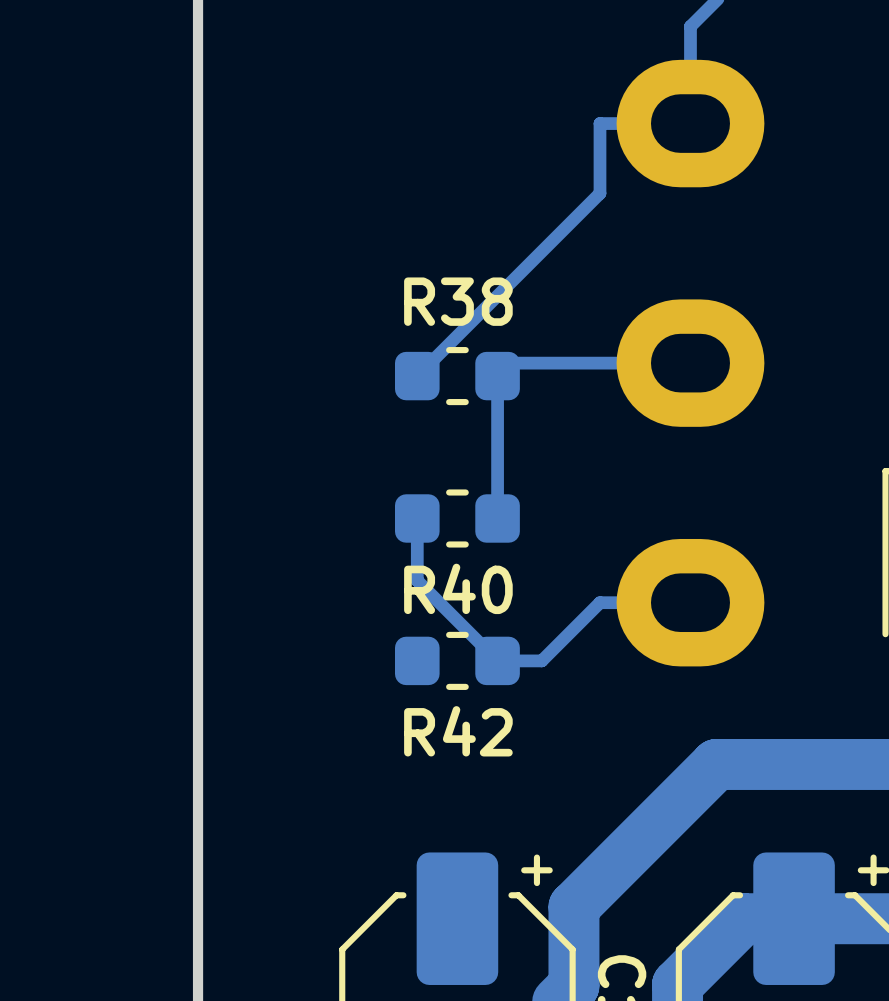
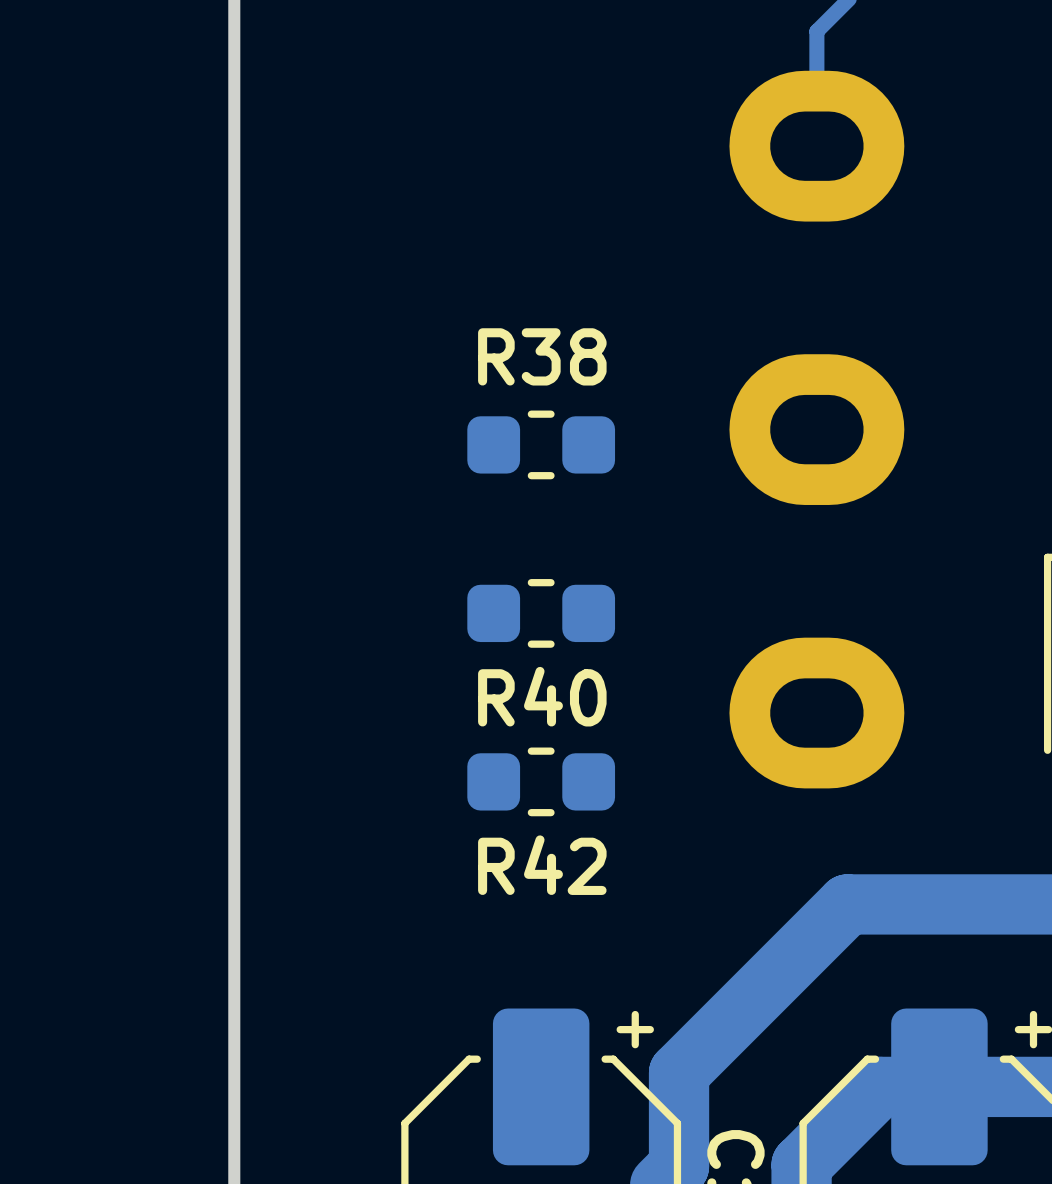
track: (690, 123) (599, 123) (599, 193) (417, 376) -> none
track: (690, 363) (510, 363) (497, 376) (497, 518) -> none
track: (417, 518) (417, 580) (497, 660) (541, 660) (599, 602) (690, 602) -> none

